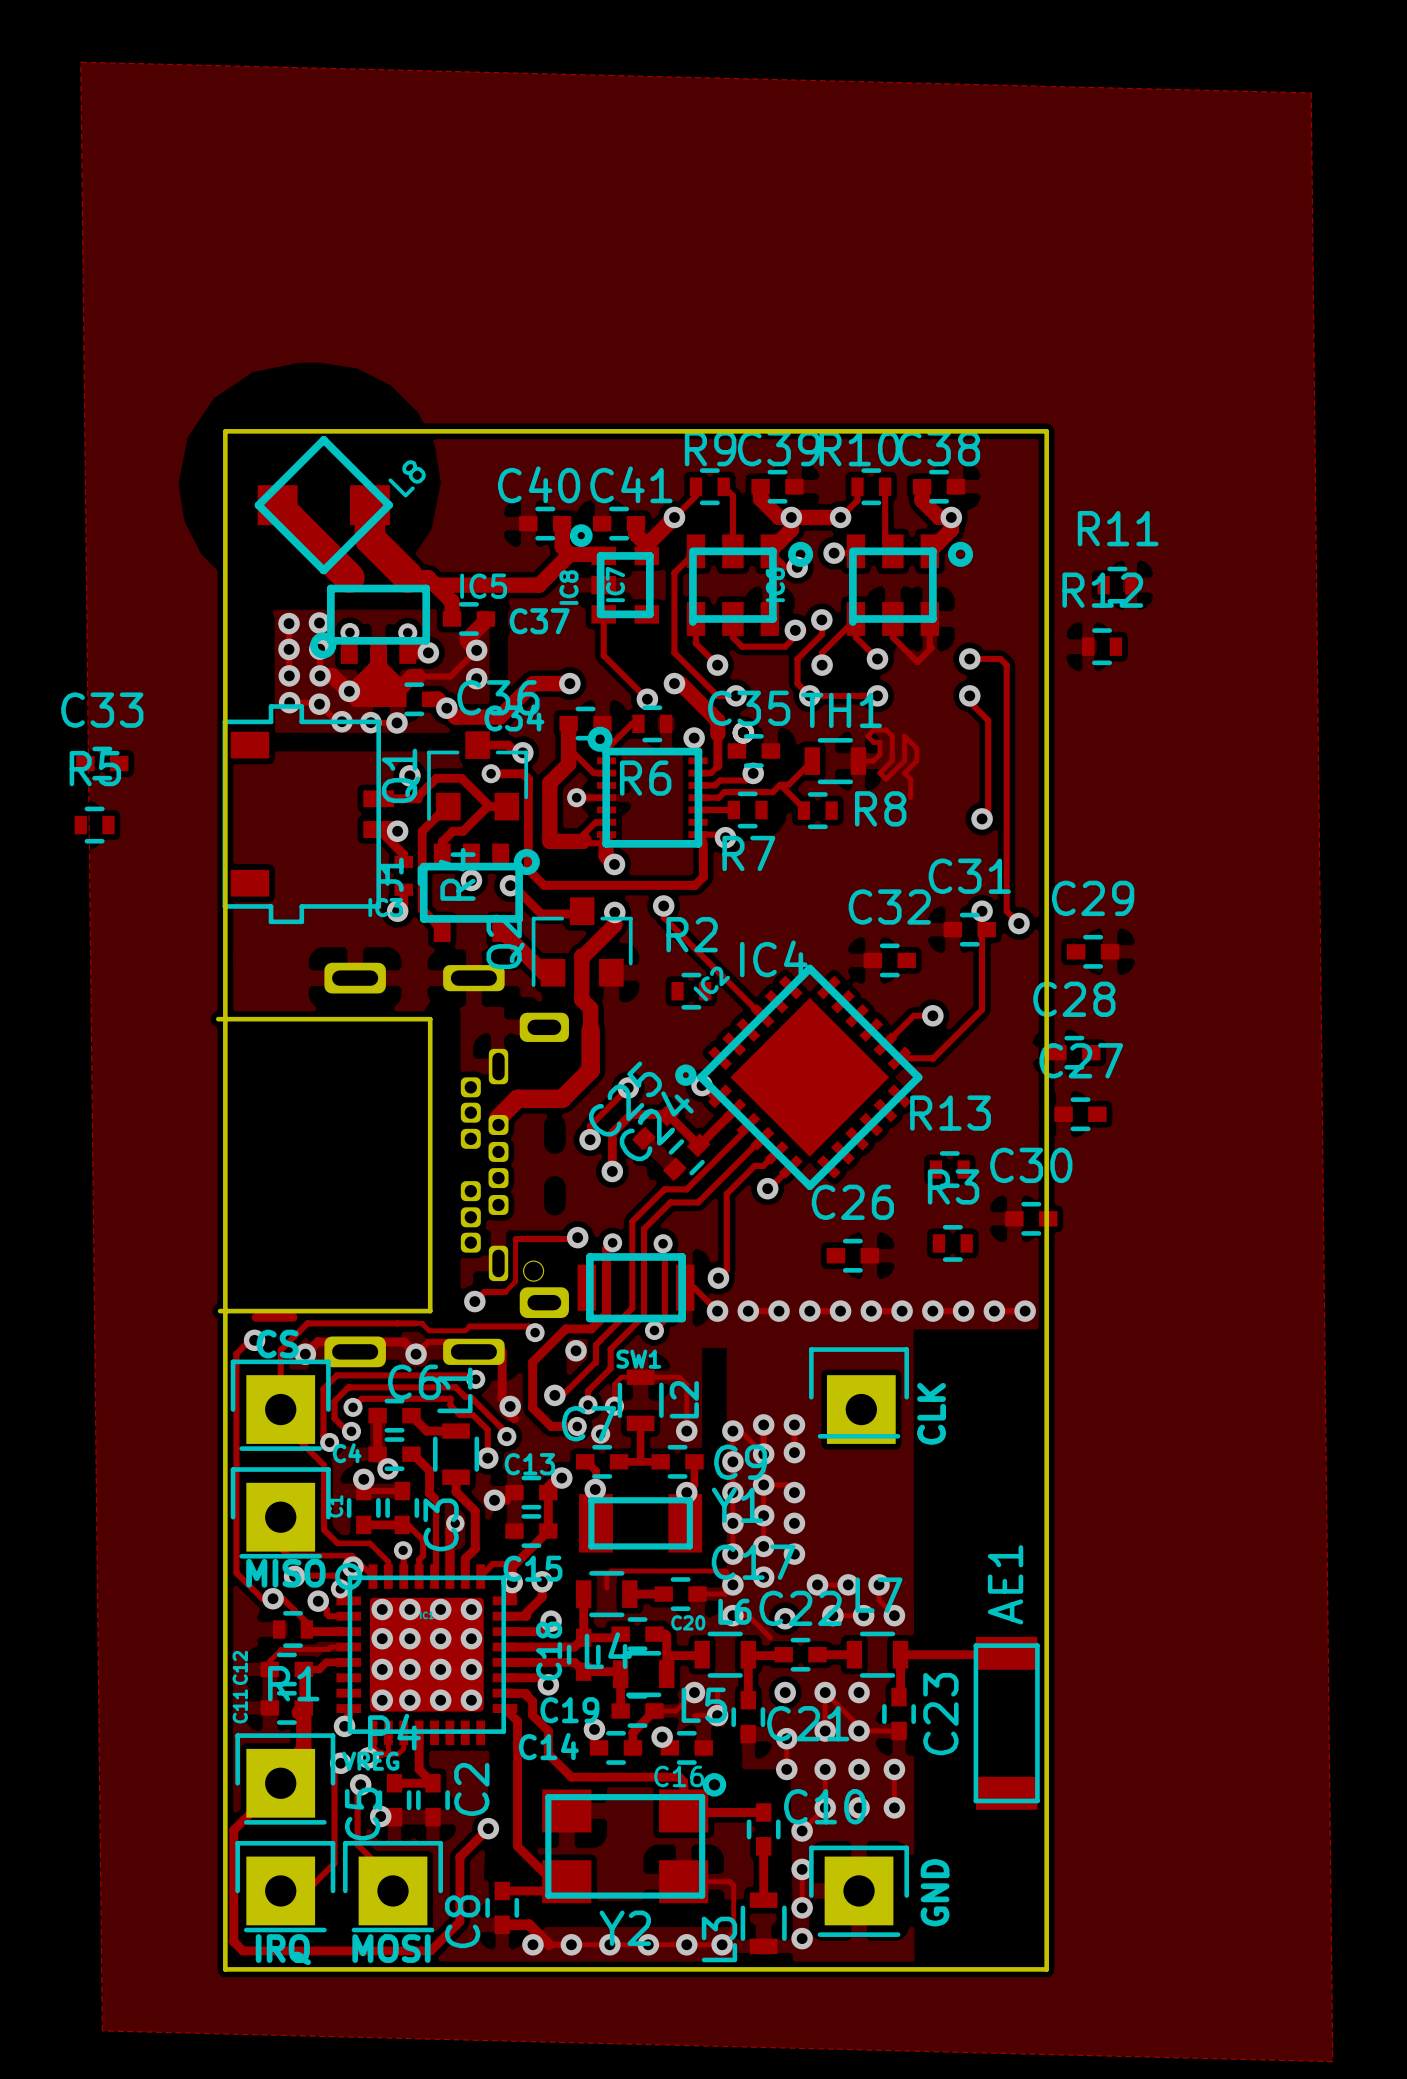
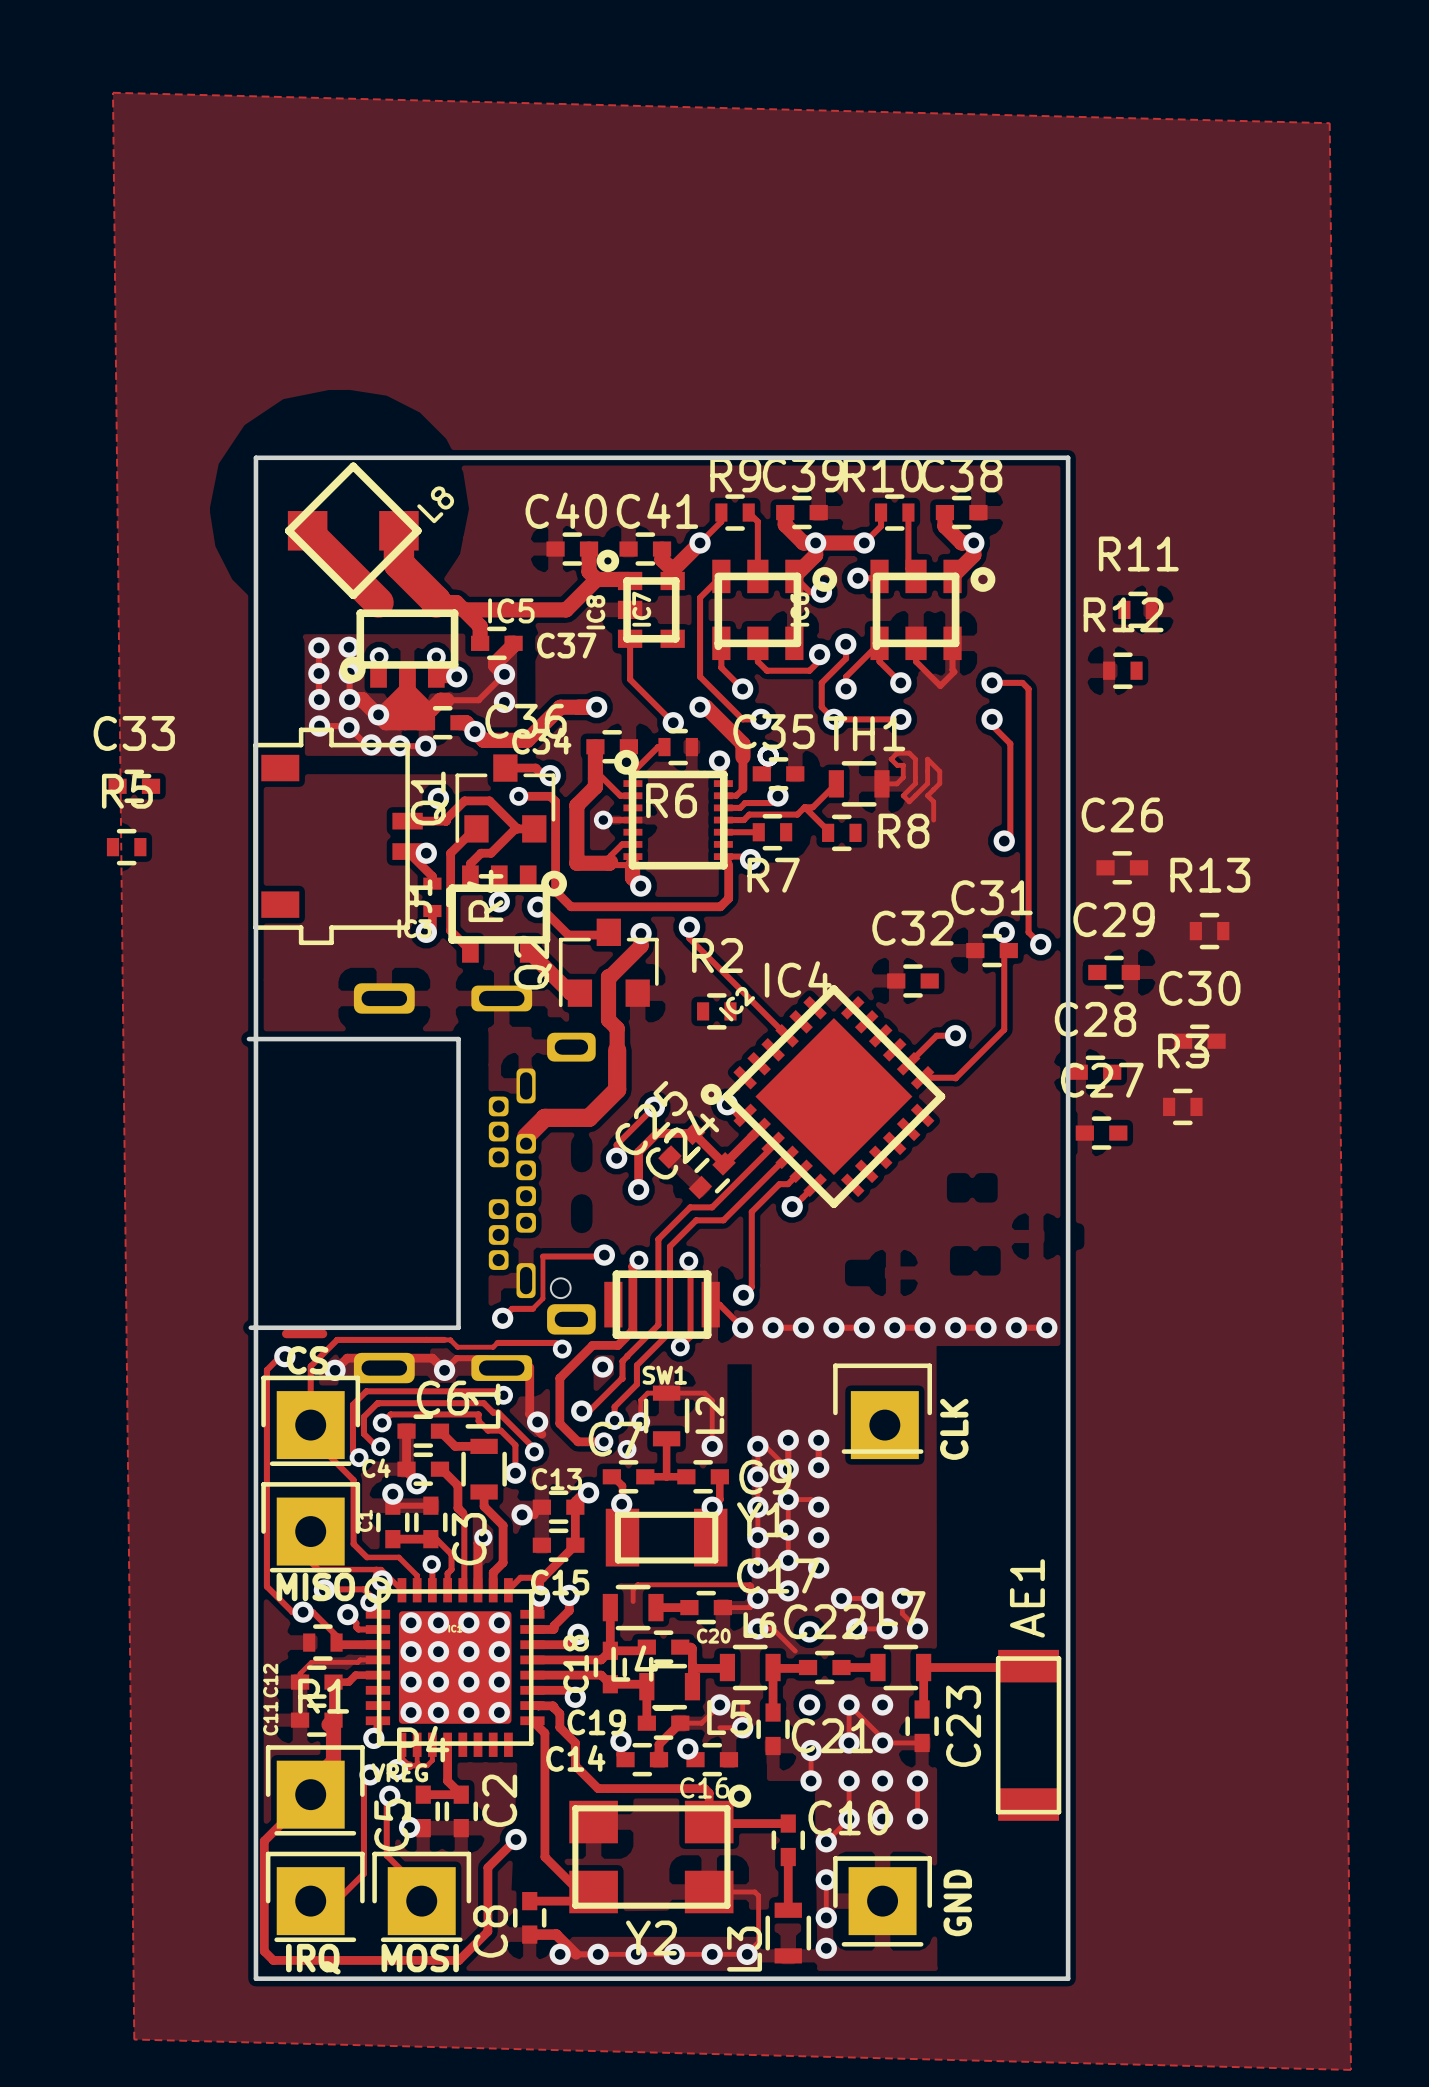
R13 position: (949, 1169) -> (1209, 931)
C30 position: (1031, 1218) -> (1199, 1041)
R3 position: (952, 1243) -> (1182, 1106)
C26 position: (852, 1255) -> (1122, 867)

